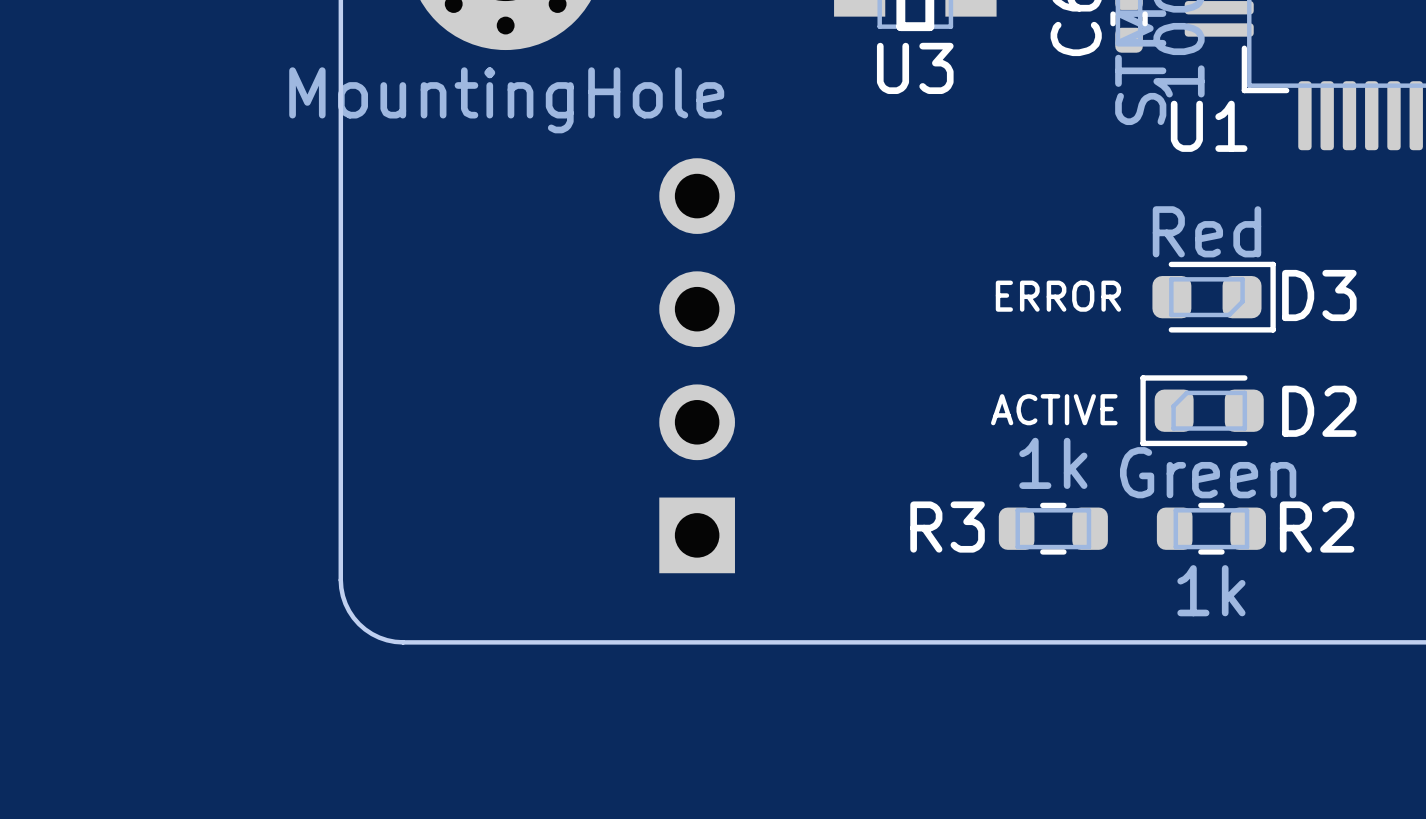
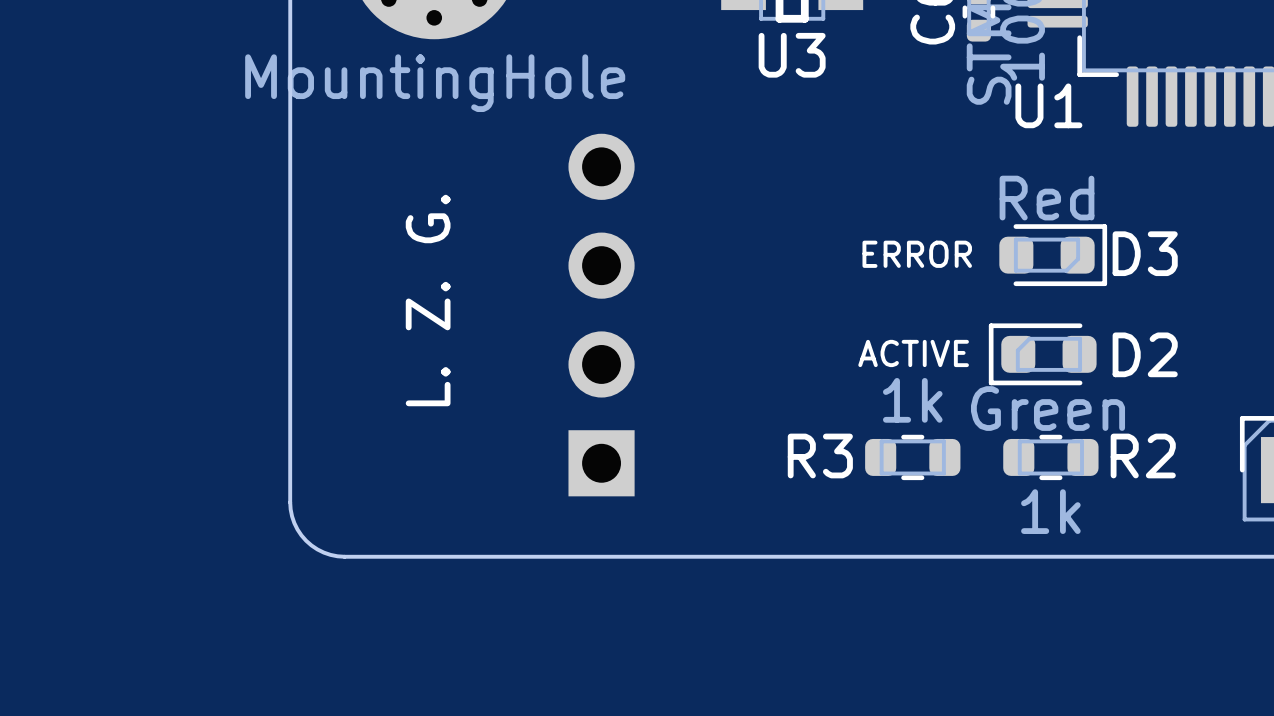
text: none -> L. Z. G. (428, 300)

